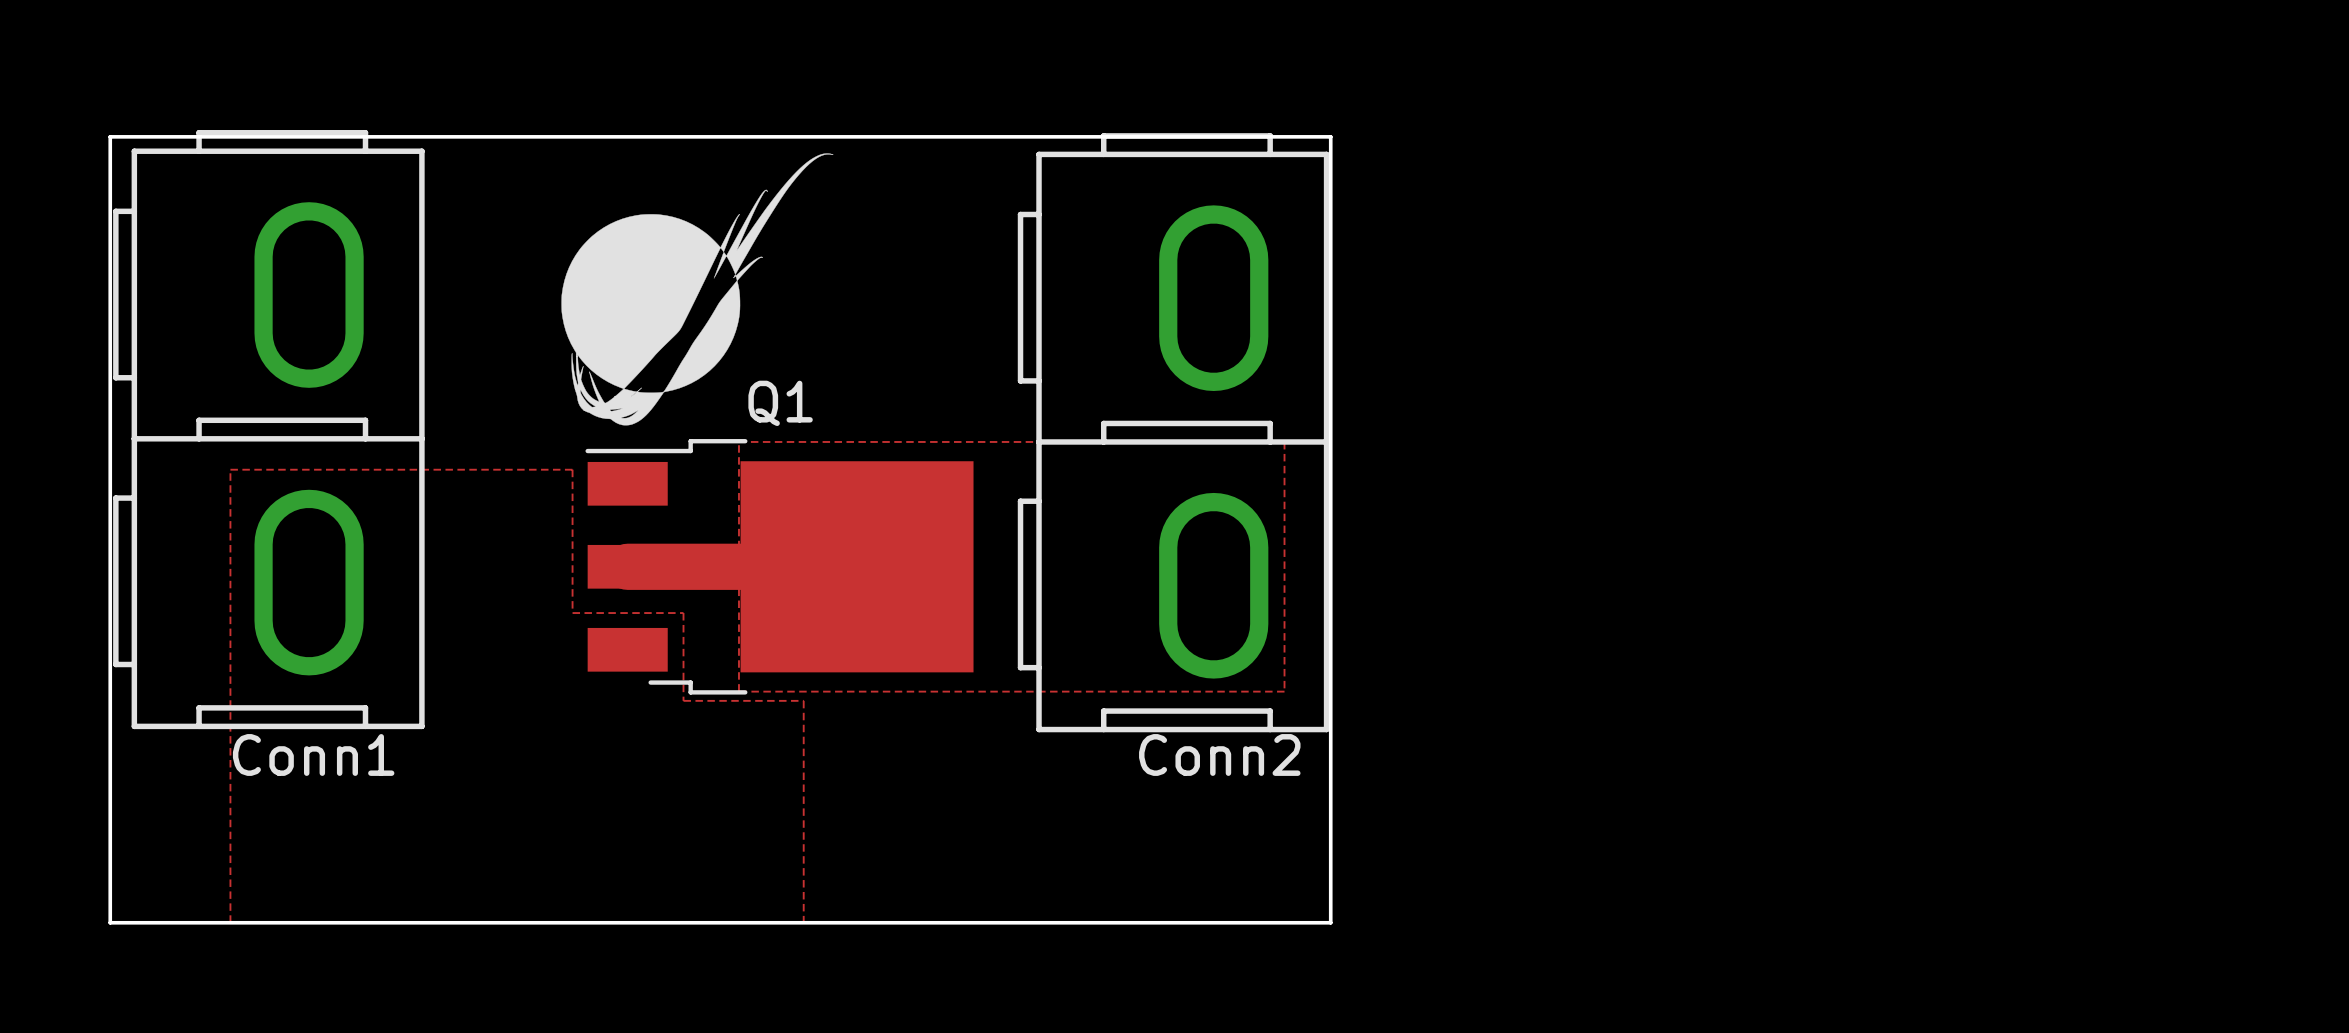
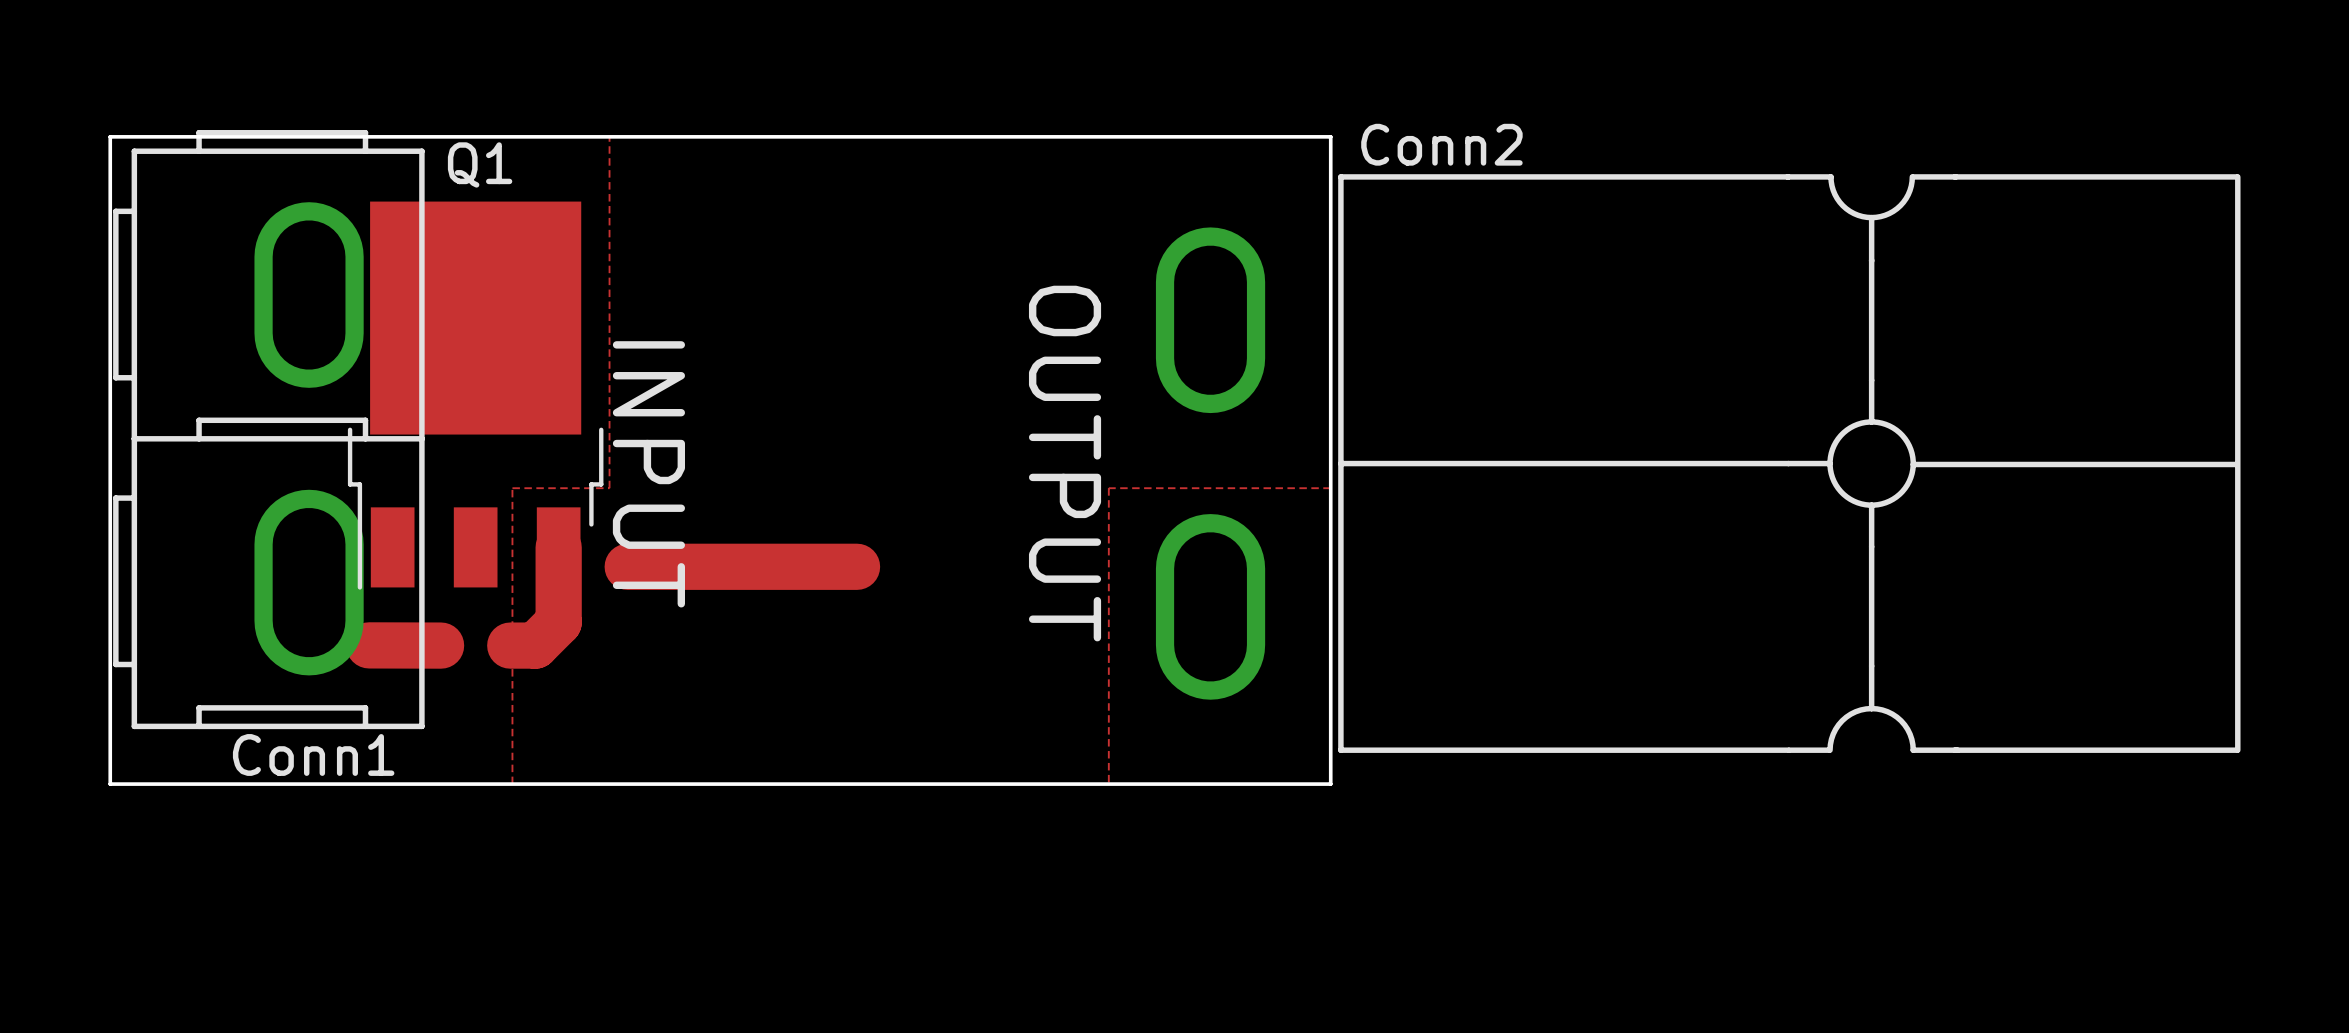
Conn2 footprint: [1017, 133, 1330, 733] -> [1155, 174, 2241, 753]
zone outline: none -> (609, 136) (609, 488) (512, 488) (512, 784)
drawing: [561, 153, 834, 426] -> none
zone outline: (738, 441) (738, 691) (1284, 691) (1284, 441) (738, 441) -> none
text: none -> OUTPUT (1065, 463)
text: none -> INPUT (648, 474)
zone outline: none -> (1330, 488) (1108, 488) (1108, 784)
track: none -> (558, 547) (558, 622) (535, 645) (510, 645)
Q1 rotation: 0° (779, 566) -> 90° counterclockwise (475, 395)
Q1 position: (779, 566) -> (475, 395)
track: none -> (369, 645) (441, 645)
Conn2 name position: Conn2 (1219, 754) -> Conn2 (1441, 144)
board edge: (110, 784) (110, 922) (1330, 922) (1330, 784) -> (110, 784) (1330, 784)
zone outline: (230, 922) (230, 469) (572, 469) (572, 613) (683, 613) (683, 700) (803, 700) (803, 922) -> none

